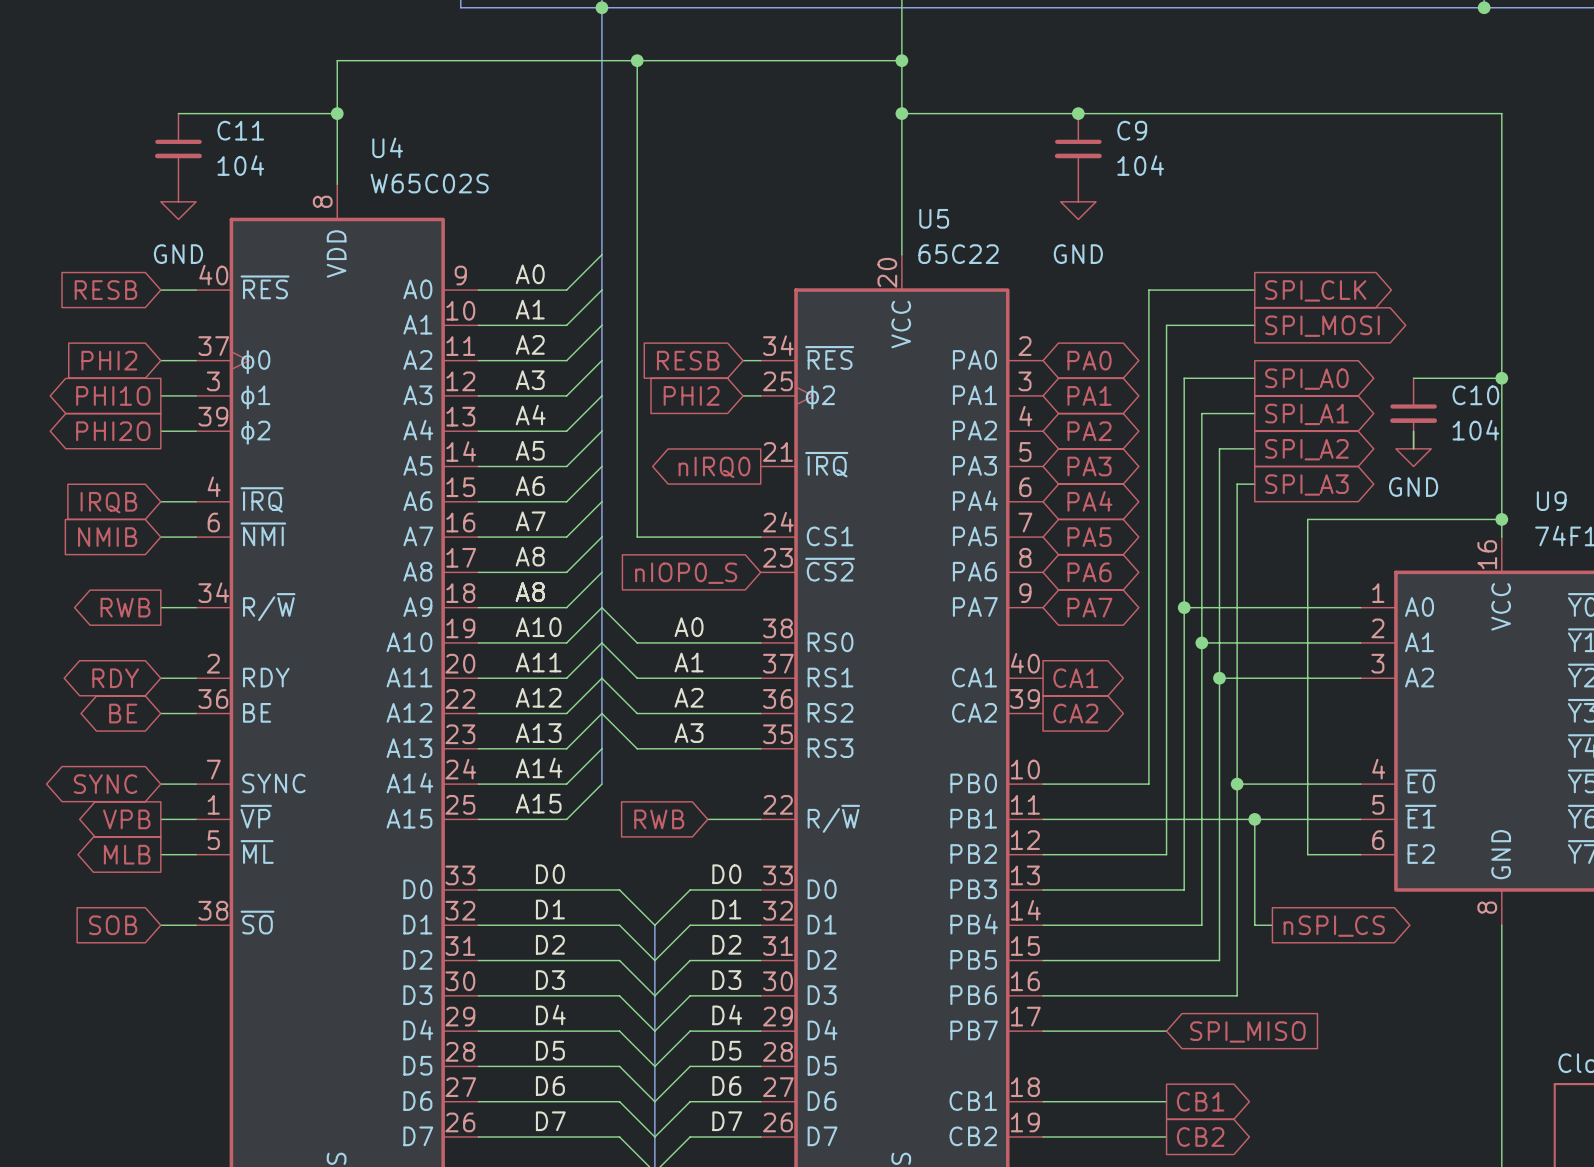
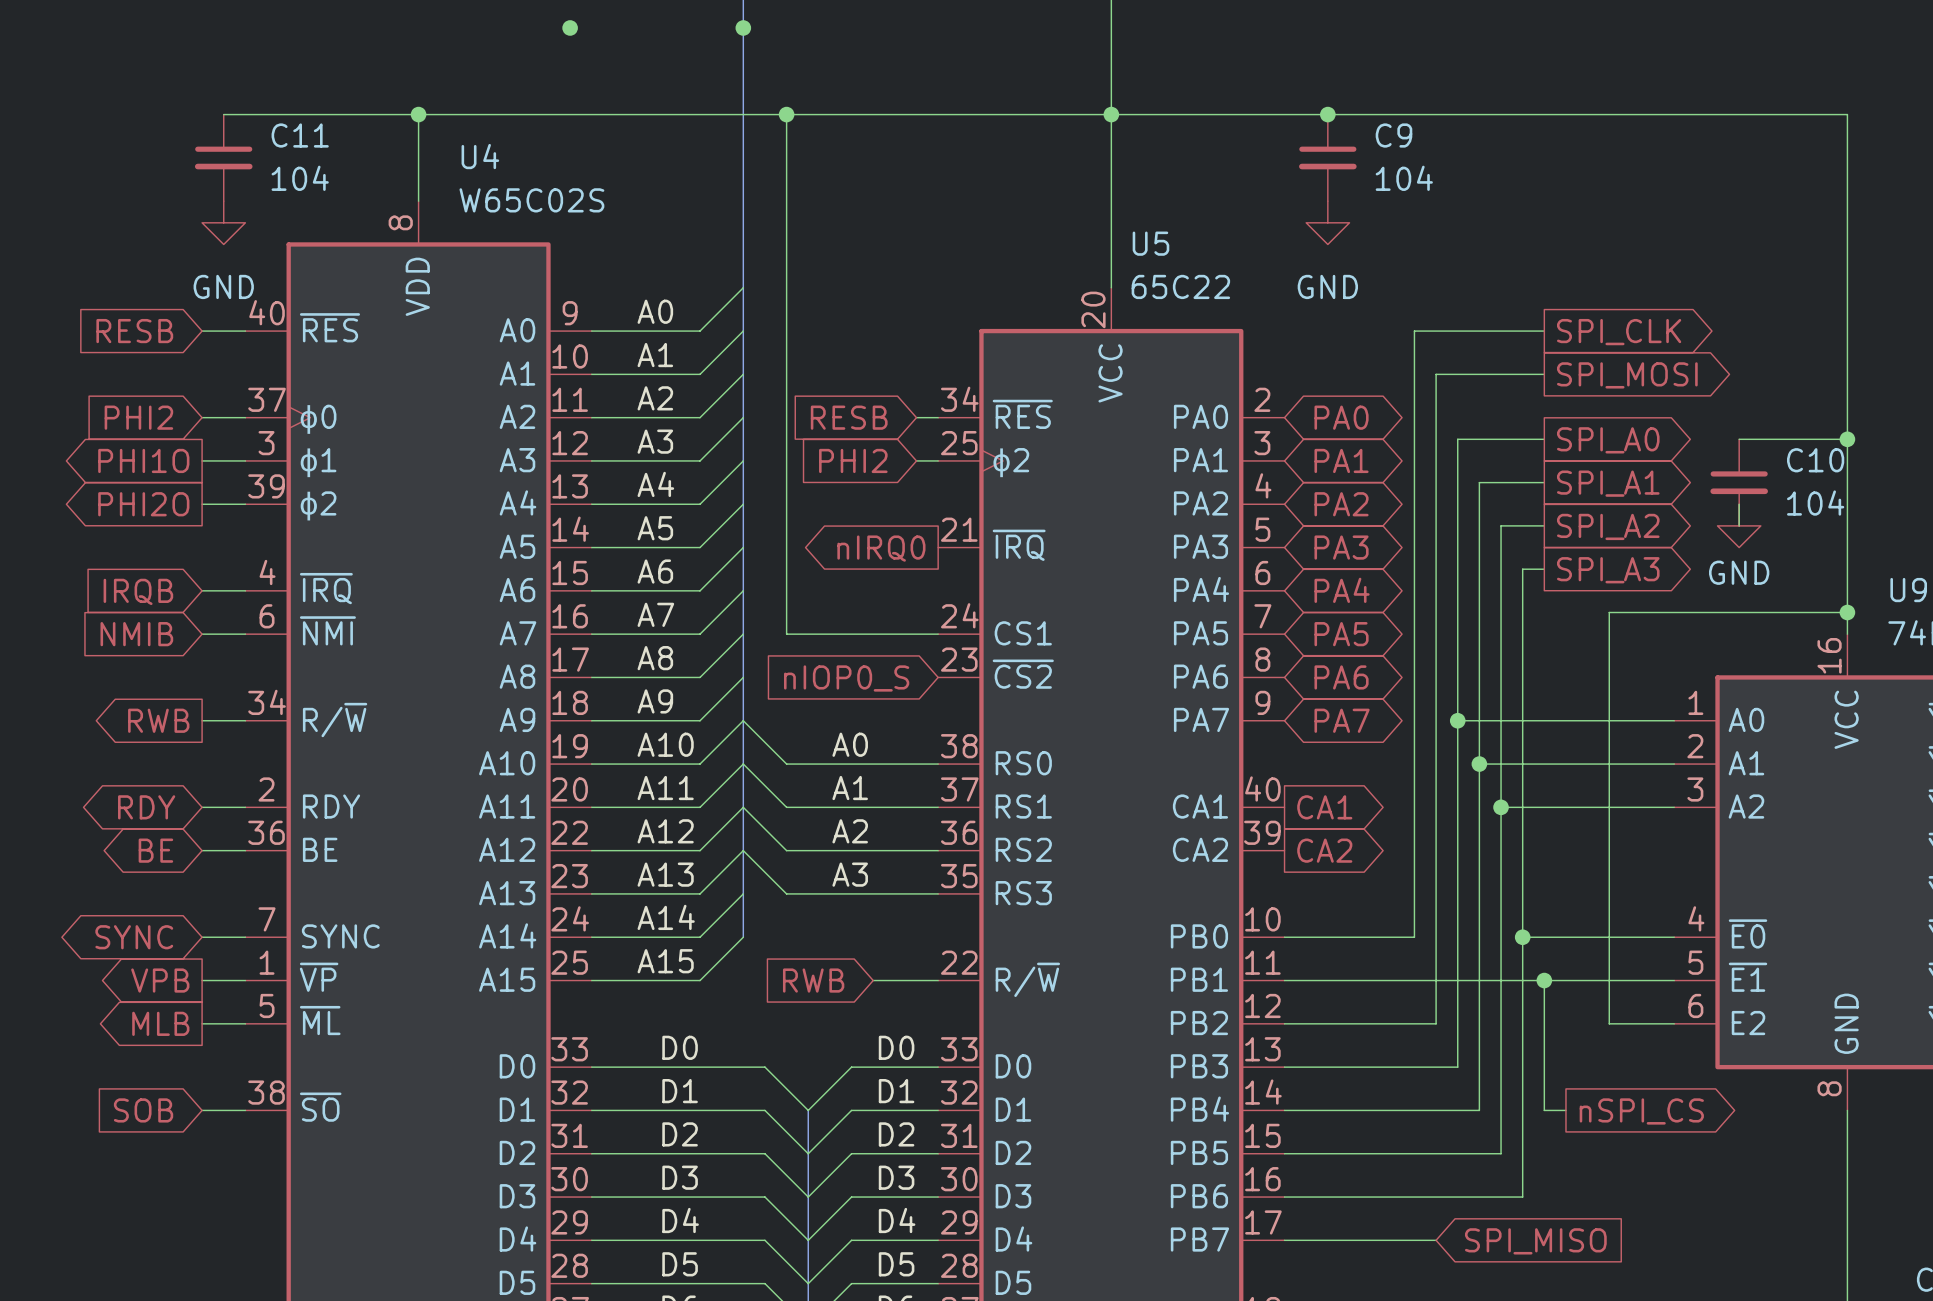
junction: none -> (570, 27)
junction: none -> (743, 27)
wire: (637, 60) (637, 113) -> none
junction: (637, 60) -> none
wire: (901, 60) (337, 60) (337, 113) -> (1111, 114) (418, 114)
junction: (901, 60) -> none
junction: none -> (786, 114)
label: A8 (530, 591) -> A9 (655, 701)

